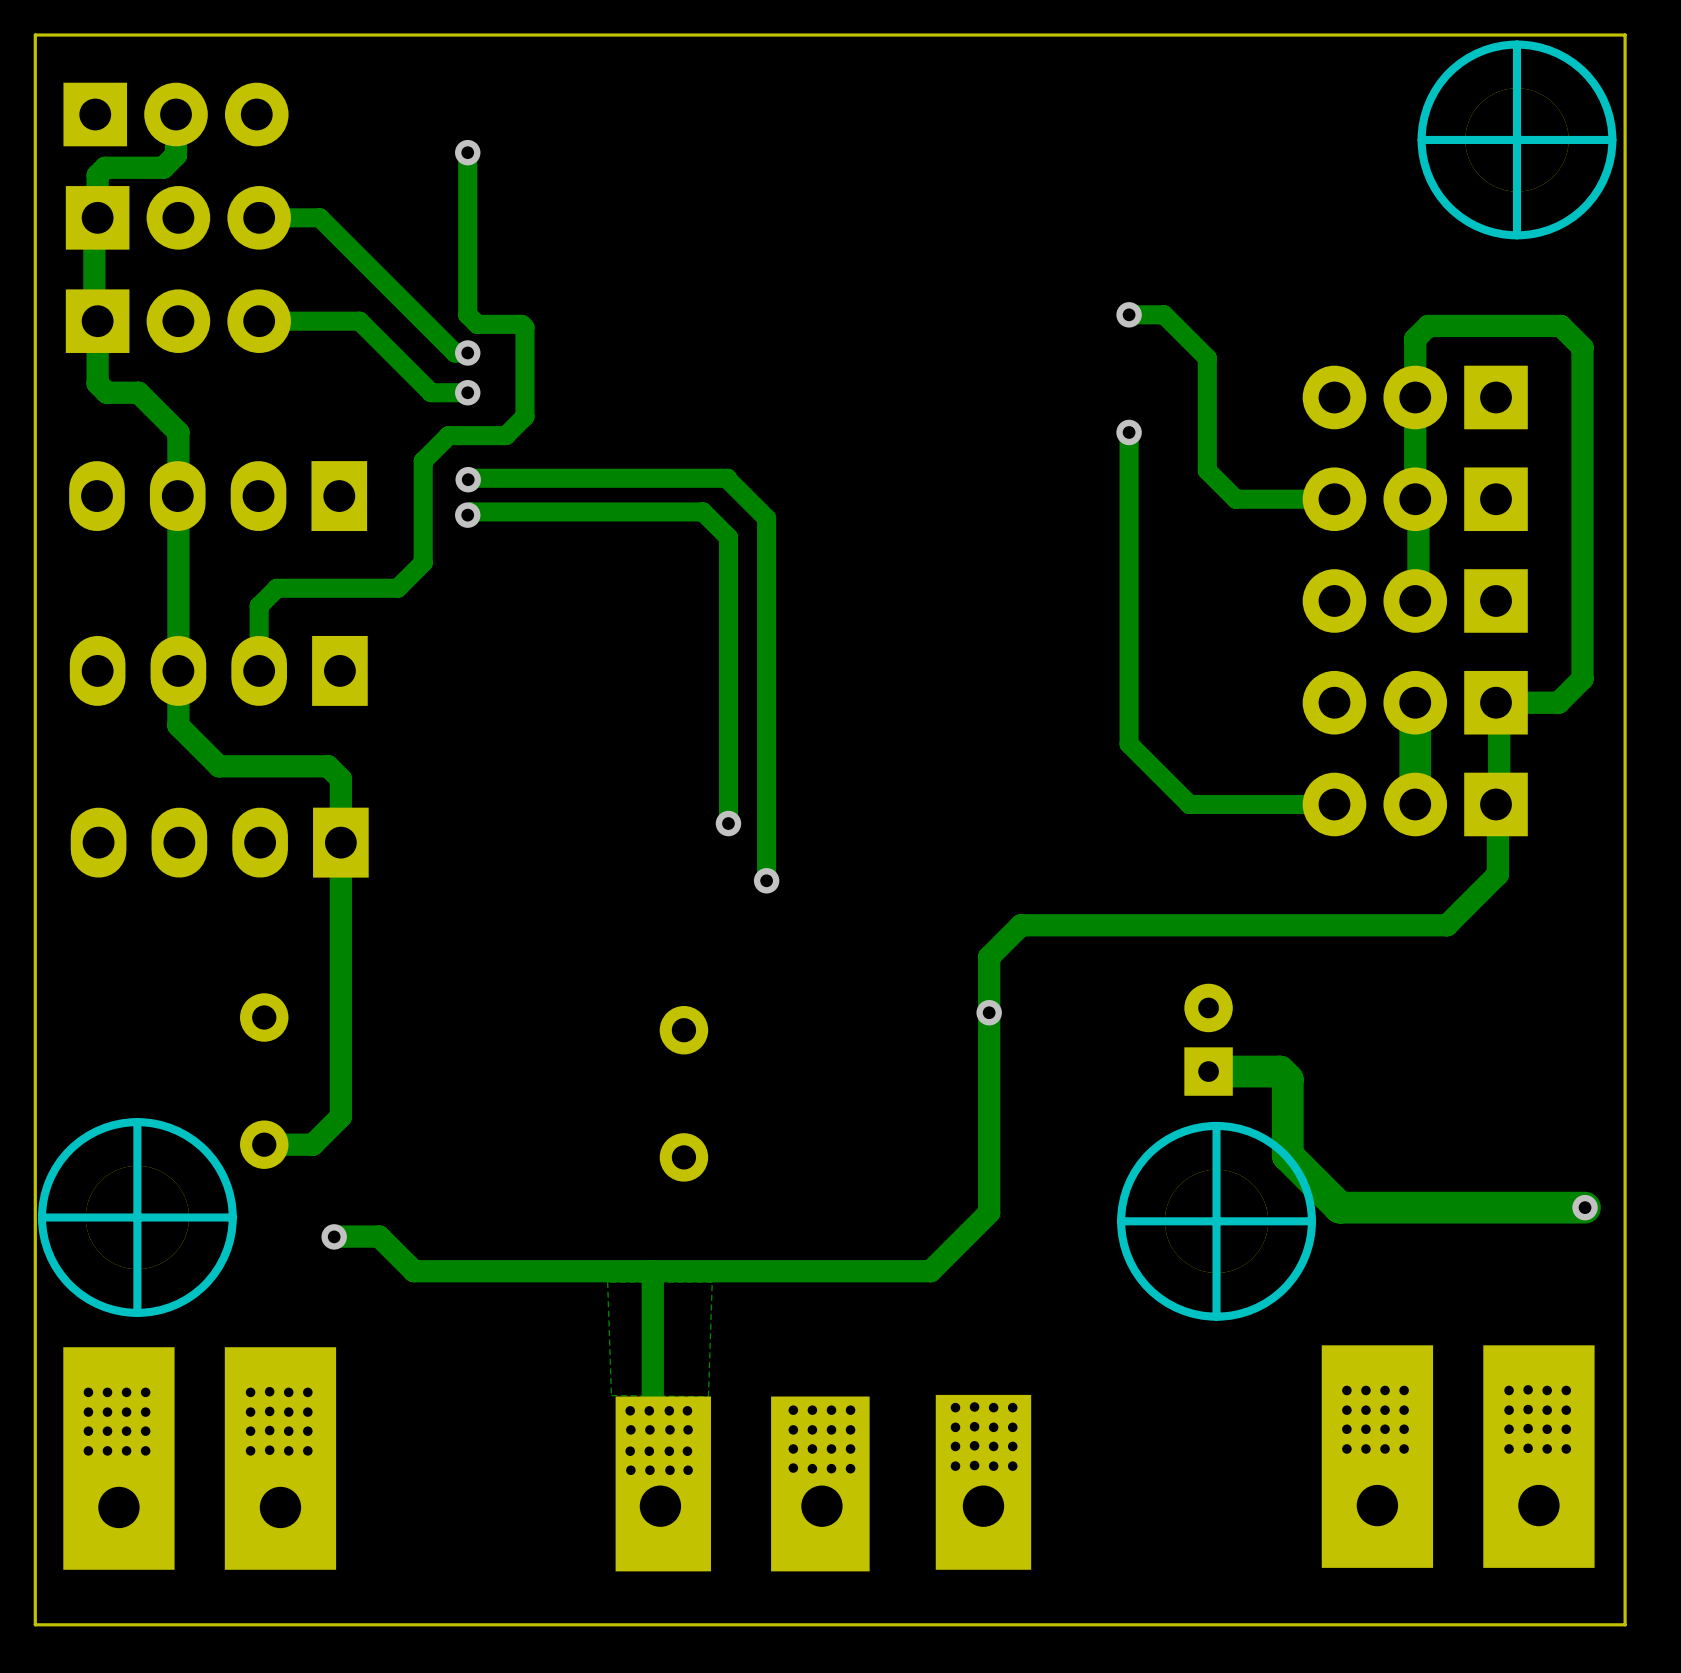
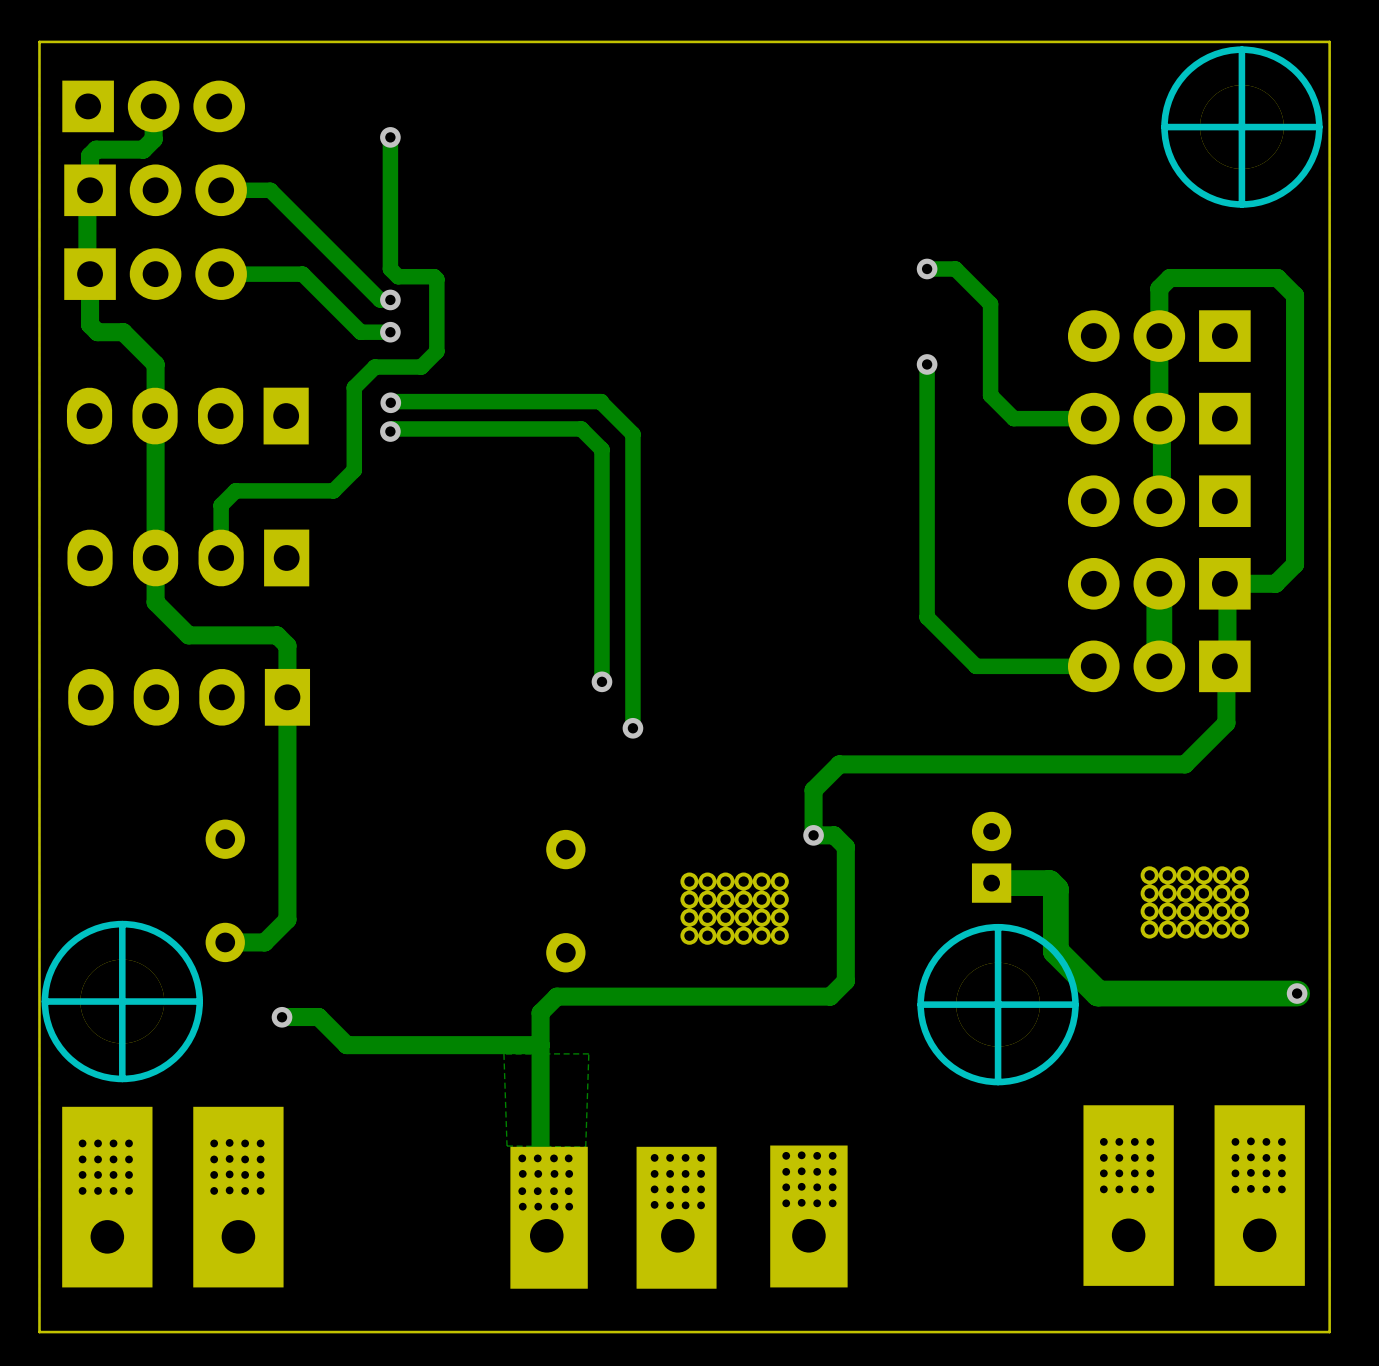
track: (989, 1012) (989, 1212) (930, 1271) (652, 1271) -> (813, 835) (834, 835) (845, 846) (845, 981) (830, 996) (556, 996) (540, 1012) (540, 1045)
part: none -> (1194, 902)
part: none -> (734, 908)

